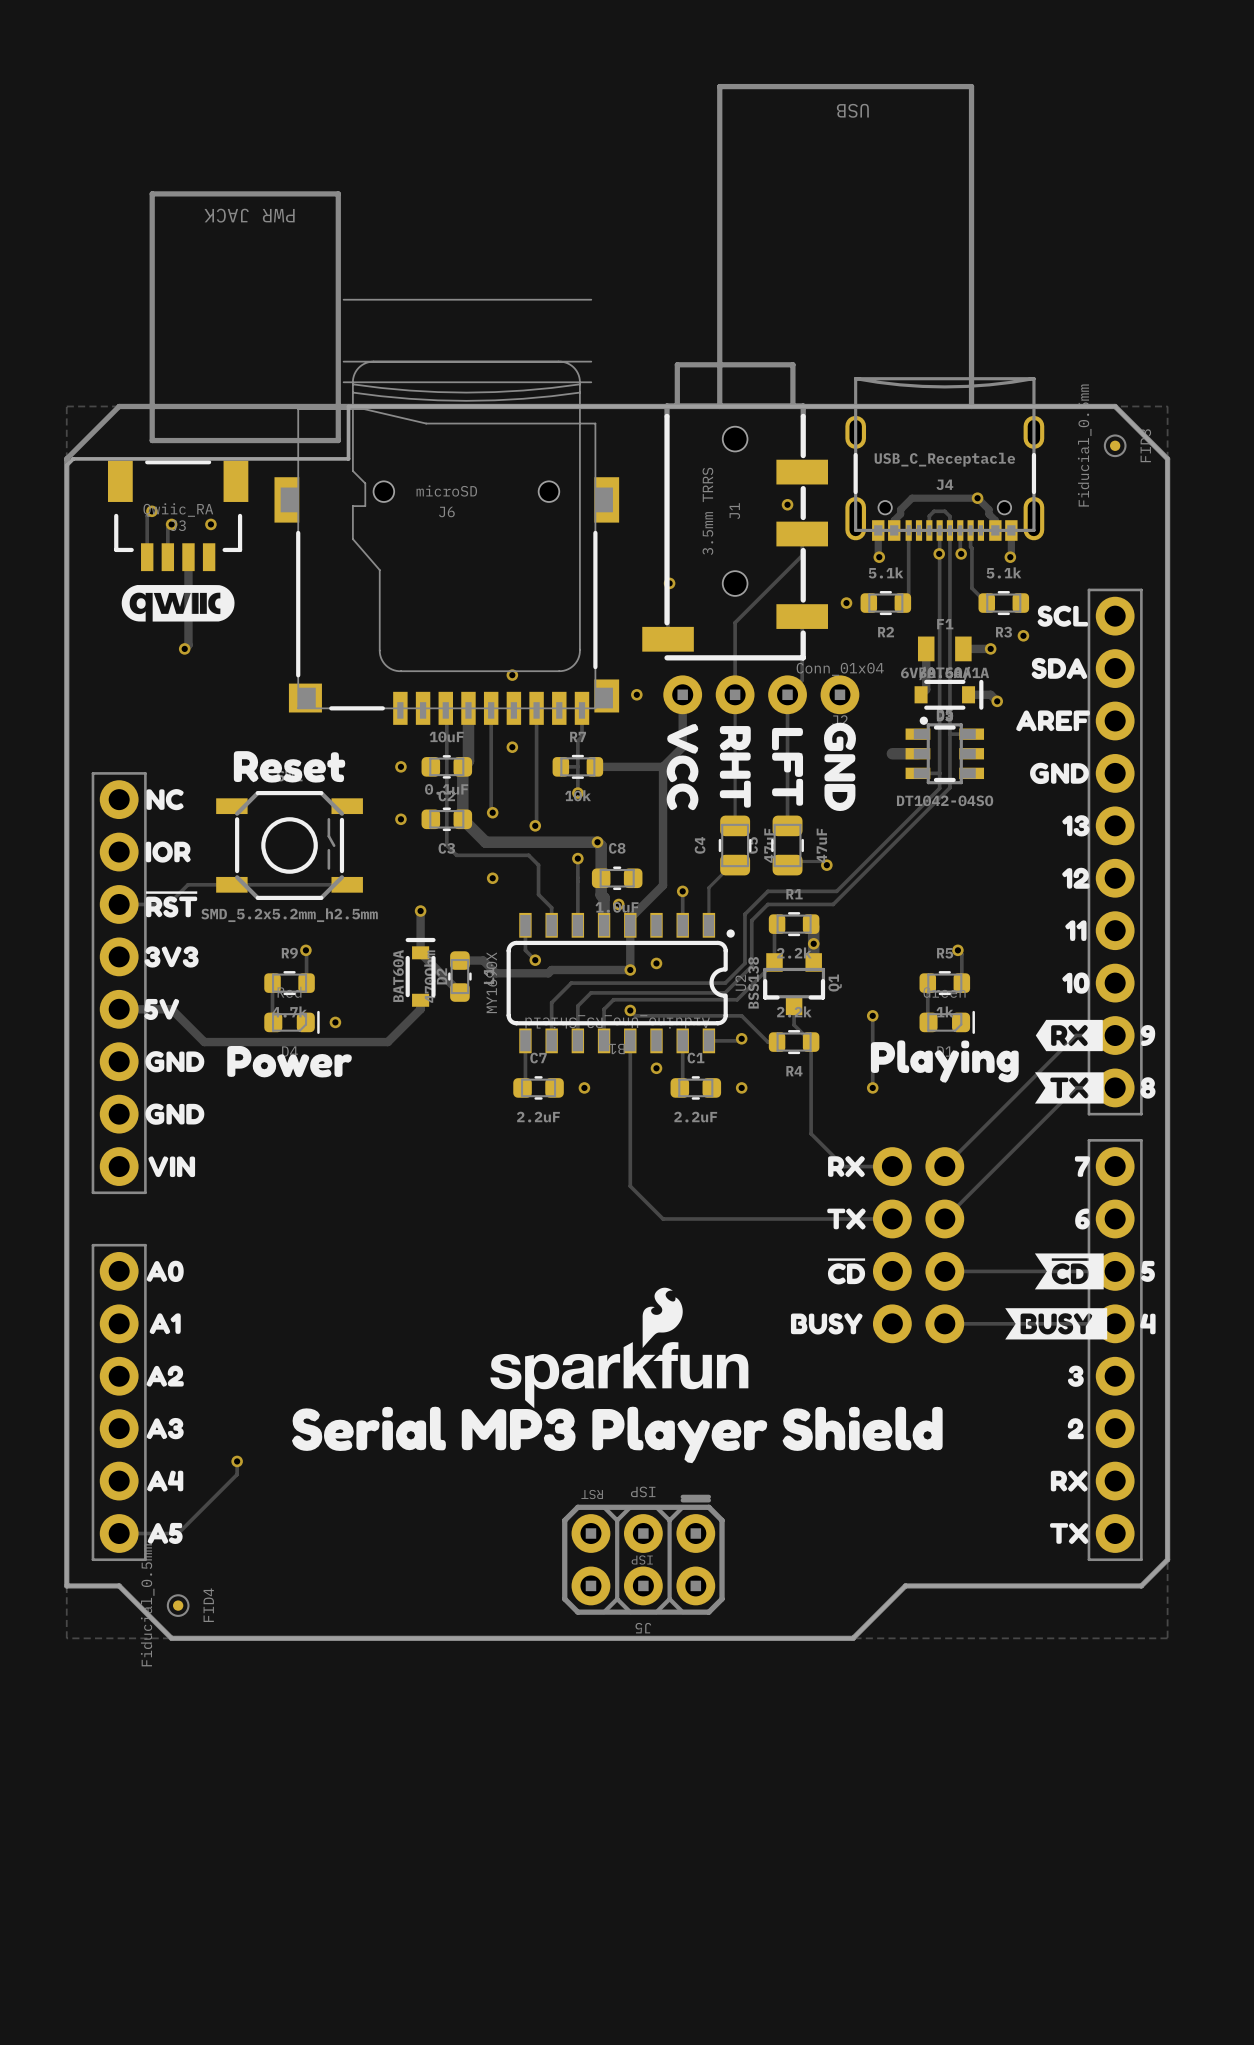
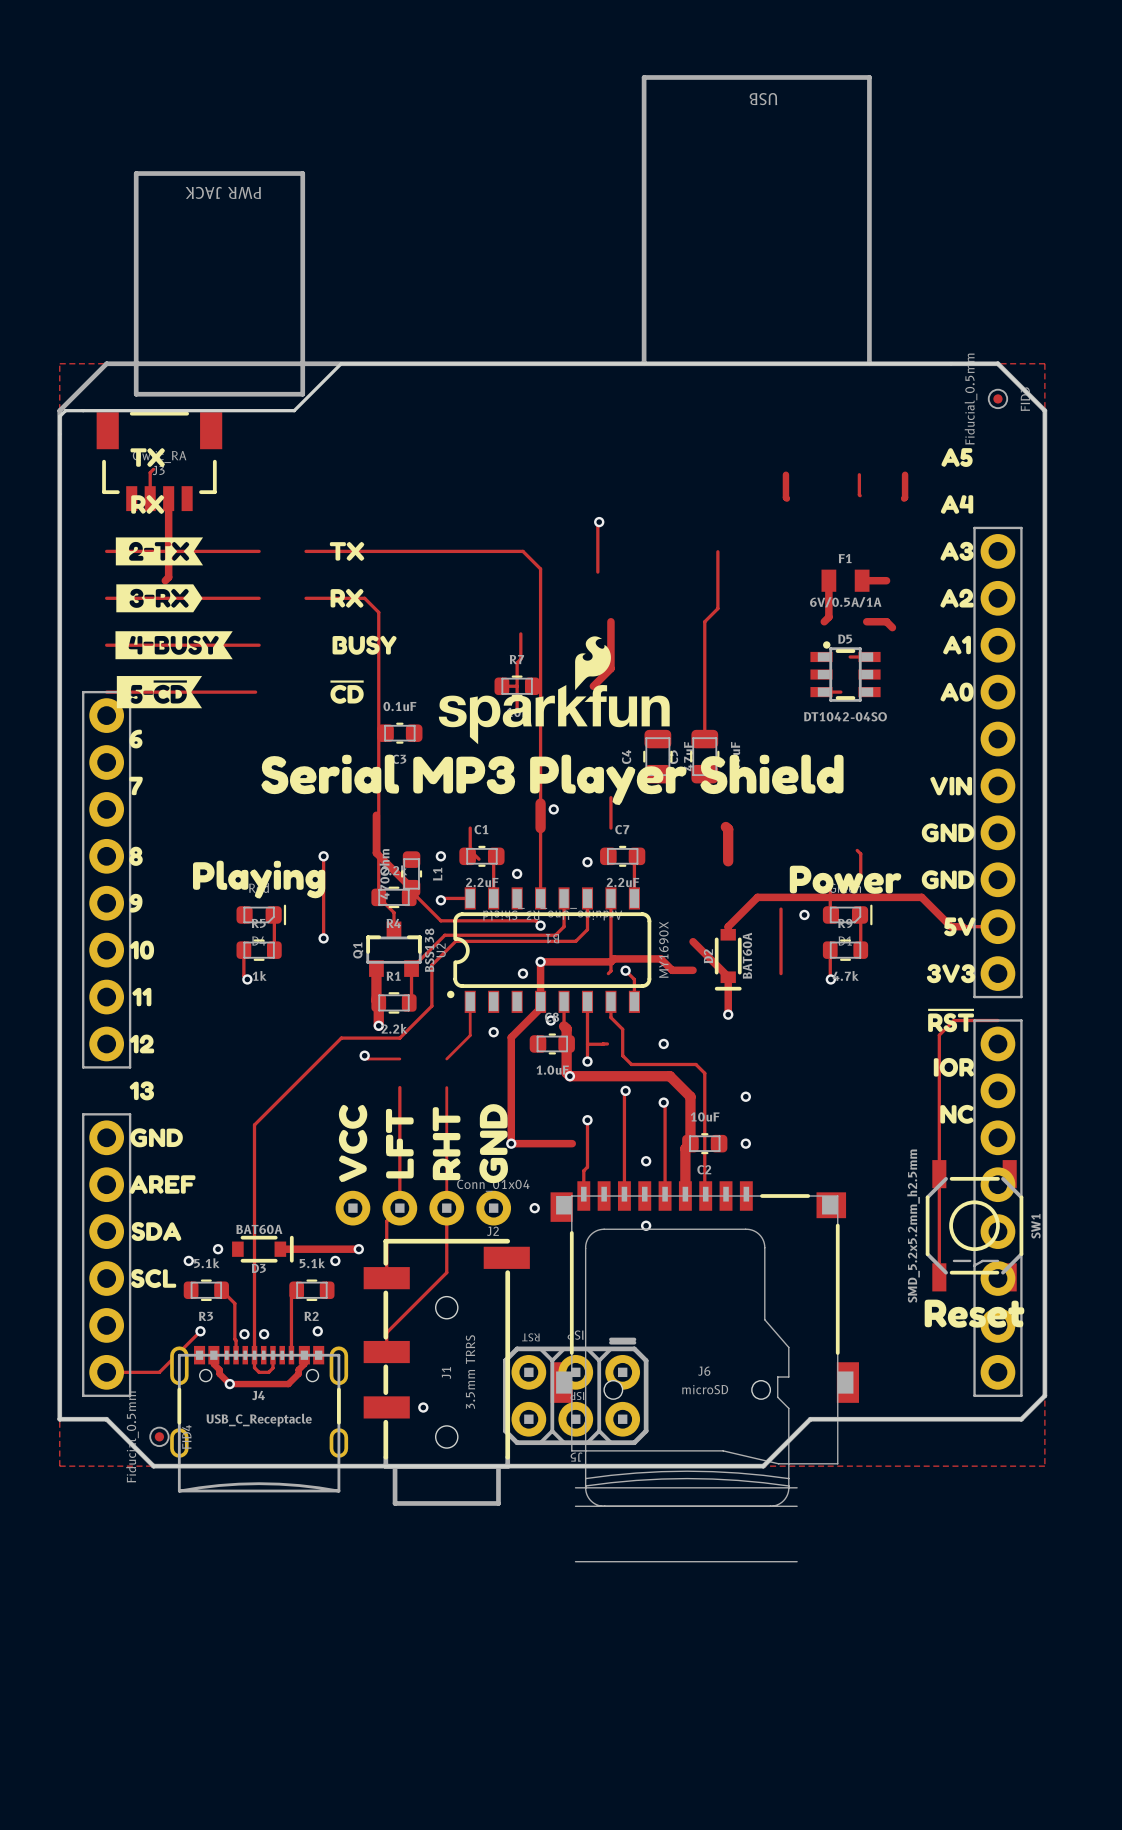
board edge: (381, 406) (348, 406) (348, 458) (328, 458) -> (341, 363) (294, 410)
J4 rotation: 0° (944, 458) -> 180° (259, 1419)
J4 position: (944, 458) -> (259, 1419)
via: (977, 498) -> none
drawing: none -> [130, 448, 165, 468]
drawing: none -> [941, 448, 973, 467]
via: (787, 504) -> none
track: (151, 511) (147, 516) (147, 557) -> none
via: (151, 511) -> none
J1 rotation: 0° (735, 511) -> 180° (446, 1372)
J1 position: (735, 511) -> (446, 1372)
J6 rotation: 0° (446, 512) -> 180° (704, 1371)
J6 position: (446, 512) -> (704, 1371)
via: (171, 524) -> none
via: (210, 524) -> none
track: (894, 530) (894, 520) (900, 514) (900, 509) (912, 498) (977, 498) (988, 509) (988, 514) (995, 520) (995, 530) -> none
track: (908, 530) (908, 597) (902, 603) -> none
track: (929, 530) (929, 516) (934, 511) (944, 511) (949, 516) (949, 787) (833, 904) (767, 904) (751, 920) (751, 966) (725, 992) (590, 992) (577, 1006) (577, 1040) -> none
track: (939, 530) (939, 788) (836, 891) (767, 891) (744, 914) (744, 963) (725, 983) (571, 983) (551, 1002) -> (496, 856) (493, 858) (493, 897)
track: (970, 530) (971, 588) (986, 603) -> none
track: (802, 534) (802, 555) (735, 622) (735, 829) -> none
drawing: none -> [131, 494, 165, 515]
via: (939, 553) -> none
via: (961, 553) -> none
drawing: none -> [940, 495, 974, 514]
via: (879, 557) -> none
via: (1010, 557) -> none
drawing shape: [121, 585, 235, 622] -> [115, 537, 204, 566]
via: (846, 603) -> none
R2 position: (885, 603) -> (311, 1290)
R3 position: (1003, 603) -> (206, 1290)
drawing: none -> [329, 541, 365, 561]
drawing shape: [1037, 605, 1089, 627] -> [940, 541, 974, 561]
track: none -> (106, 551) (259, 551)
via: (1023, 635) -> none
via: (184, 648) -> none
via: (990, 648) -> none
drawing: none -> [115, 584, 233, 749]
drawing: none -> [330, 588, 364, 608]
drawing shape: [1031, 657, 1088, 680] -> [940, 588, 974, 608]
track: none -> (106, 598) (259, 598)
track: none -> (306, 598) (364, 598) (378, 612) (378, 897) (393, 912) (393, 929)
via: (512, 675) -> none
via: (636, 694) -> none
J2 position: (761, 694) -> (423, 1208)
D3 position: (949, 694) -> (262, 1249)
via: (997, 701) -> none
track: (445, 708) (446, 845) (456, 855) (528, 855) (538, 865) (538, 894) (551, 907) (551, 925) -> none
track: (468, 708) (468, 761) (462, 766) (462, 819) (485, 842) (597, 842) (601, 845) (601, 895) (604, 897) -> (306, 551) (522, 551) (540, 568) (540, 803)
track: (491, 708) (492, 812) -> none
track: (536, 708) (535, 825) -> none
drawing: none -> [332, 635, 397, 655]
drawing shape: [1016, 710, 1090, 732] -> [943, 635, 971, 655]
drawing: none -> [261, 636, 844, 806]
track: none -> (106, 645) (259, 645)
drawing: [666, 722, 856, 812] -> none
via: (512, 747) -> none
drawing: [233, 751, 346, 783] -> none
track: (892, 753) (917, 753) -> none
drawing: none -> [330, 680, 364, 704]
drawing shape: [1030, 762, 1089, 785] -> [940, 682, 974, 702]
via: (400, 766) -> none
C2 position: (446, 766) -> (704, 1143)
track: (594, 766) (663, 766) (663, 885) (630, 918) (630, 969) (551, 969) (548, 973) (495, 973) (483, 960) (459, 960) -> none
track: none -> (106, 692) (255, 692)
drawing: [146, 789, 184, 811] -> none
via: (577, 793) -> none
via: (492, 812) -> none
drawing: [1062, 815, 1090, 837] -> none
via: (400, 819) -> none
via: (535, 825) -> none
drawing: [145, 841, 191, 863] -> none
via: (597, 842) -> none
SW1 rotation: 0° (289, 845) -> 90° clockwise (974, 1225)
SW1 position: (289, 845) -> (974, 1225)
track: (577, 858) (577, 925) -> (587, 1001) (587, 1061)
via: (577, 858) -> none
track: (735, 861) (708, 887) (708, 925) -> none
track: (787, 861) (823, 861) (826, 865) -> none
via: (826, 865) -> none
drawing: none -> [129, 776, 143, 796]
drawing shape: [1062, 867, 1090, 889] -> [930, 776, 973, 796]
via: (492, 878) -> none
C8 position: (617, 878) -> (552, 1043)
track: (347, 884) (187, 884) (168, 904) (119, 904) -> none
drawing: [145, 891, 198, 918] -> none
via: (682, 891) -> none
via: (420, 911) -> none
drawing shape: [1065, 920, 1087, 942] -> [921, 823, 975, 843]
track: (777, 924) (774, 926) (774, 962) (737, 999) (613, 999) (604, 1009) (604, 1040) -> none
R1 position: (794, 924) -> (393, 1002)
via: (813, 943) -> none
drawing shape: [144, 946, 199, 968] -> [129, 846, 143, 866]
track: (305, 950) (306, 983) -> none
via: (305, 950) -> none
via: (957, 950) -> none
track: none -> (323, 856) (323, 938)
via: none -> (323, 856)
via: none -> (440, 856)
track: none -> (636, 856) (634, 858) (634, 898)
via: (535, 960) -> none
drawing: none -> [192, 860, 326, 899]
drawing: none -> [789, 865, 902, 894]
via: (630, 969) -> none
D2 rotation: 0° (420, 972) -> 180° (728, 959)
D2 position: (420, 972) -> (728, 959)
drawing shape: [1062, 972, 1090, 994] -> [921, 870, 975, 890]
via: none -> (517, 873)
track: (272, 983) (273, 1022) -> none
R9 position: (289, 983) -> (845, 950)
U2 rotation: 0° (620, 983) -> 180° (549, 950)
R5 position: (944, 983) -> (259, 950)
Q1 rotation: 0° (794, 984) -> 180° (393, 949)
Q1 position: (794, 984) -> (393, 949)
drawing shape: [144, 998, 180, 1021] -> [129, 893, 143, 913]
track: (420, 1000) (420, 1009) (387, 1042) (204, 1042) (171, 1009) (119, 1009) -> none
track: none -> (409, 897) (417, 897) (440, 920) (535, 920) (540, 925)
track: none -> (470, 898) (442, 898) (440, 900)
track: (551, 1003) (551, 1040) -> (610, 898) (610, 931)
track: none -> (564, 898) (564, 926) (555, 935) (444, 935) (411, 968) (411, 1000) (409, 1002)
track: none -> (587, 898) (587, 929) (575, 941) (455, 941) (431, 965) (431, 1006) (399, 1038) (341, 1038) (254, 1124) (254, 1367) (259, 1372) (268, 1372) (272, 1368) (272, 1355)
track: (794, 1005) (794, 1025) (811, 1042) (811, 1133) (843, 1166) (892, 1166) -> none
via: none -> (440, 900)
track: (630, 1010) (635, 1015) (741, 1015) (767, 1042) (777, 1042) -> none
via: (630, 1010) -> none
via position: (872, 1015) -> (804, 914)
drawing shape: [1035, 1019, 1103, 1052] -> [944, 917, 976, 937]
track: none -> (273, 914) (274, 950)
via: (335, 1022) -> none
track: none -> (860, 914) (860, 950)
drawing: [1140, 1025, 1156, 1047] -> none
via: none -> (540, 925)
track: (1075, 1035) (944, 1166) -> (962, 926) (951, 926) (921, 897) (757, 897) (728, 926) (728, 934)
track: (741, 1038) (739, 1040) (708, 1040) -> none
via: (741, 1038) -> none
track: (525, 1040) (525, 1085) (522, 1087) -> none
track: (630, 1040) (630, 1119) -> (540, 828) (540, 898)
drawing: [870, 1040, 1019, 1083] -> none
R4 position: (794, 1042) -> (393, 897)
drawing: [227, 1045, 352, 1078] -> none
via: none -> (323, 938)
drawing shape: [145, 1051, 205, 1073] -> [129, 940, 155, 960]
track: none -> (693, 941) (728, 976) (728, 1014)
track: none -> (243, 950) (243, 975) (247, 979)
track: none -> (830, 950) (830, 979)
via: (656, 1068) -> none
drawing shape: [1034, 1072, 1104, 1104] -> [926, 964, 976, 984]
via: none -> (540, 961)
drawing: [1140, 1077, 1156, 1099] -> none
track: none -> (376, 968) (378, 1025)
track: none -> (625, 970) (634, 979) (634, 1001)
via: none -> (625, 970)
track: none -> (693, 970) (672, 970) (660, 958) (613, 958) (610, 961) (540, 961) (540, 1008) (511, 1037) (511, 1143) (572, 1143)
C7 position: (538, 1087) -> (622, 856)
C1 position: (695, 1087) -> (481, 856)
via: (741, 1087) -> none
via: (872, 1087) -> none
track: (1115, 1087) (1075, 1087) (944, 1218) -> none
via: none -> (247, 979)
via: none -> (830, 979)
drawing shape: [145, 1103, 205, 1125] -> [132, 987, 152, 1007]
track: none -> (470, 1001) (470, 1035) (446, 1058)
track: none -> (610, 1001) (610, 1017) (622, 1029) (622, 1055) (631, 1064) (695, 1064) (704, 1073) (705, 1196)
drawing: none -> [928, 1008, 974, 1033]
via: none -> (728, 1014)
via: none -> (550, 1020)
track: none -> (997, 1020) (953, 1020) (939, 1035) (939, 1277)
via: none -> (378, 1025)
track: (630, 1146) (630, 1186) (663, 1218) (892, 1218) -> (564, 1026) (566, 1028) (566, 1072) (569, 1076) (669, 1076) (690, 1096) (690, 1143) (685, 1148) (685, 1196)
via: none -> (493, 1032)
drawing: [828, 1155, 865, 1178] -> none
drawing shape: [148, 1156, 196, 1178] -> [129, 1034, 155, 1054]
drawing: [1074, 1156, 1090, 1177] -> none
track: none -> (607, 1043) (587, 1044)
via: none -> (663, 1043)
part: (918, 1166) -> none
track: none -> (364, 1055) (367, 1058) (399, 1058)
via: none -> (364, 1055)
drawing: none -> [933, 1057, 975, 1077]
via: none -> (587, 1061)
via: none -> (569, 1076)
drawing: none -> [129, 1081, 155, 1101]
drawing: [827, 1208, 866, 1230] -> none
drawing: [1005, 1208, 1108, 1340] -> none
track: none -> (399, 1087) (399, 1208) (386, 1221) (386, 1278)
track: none -> (446, 1087) (446, 1272) (386, 1332) (386, 1352)
track: none -> (625, 1090) (624, 1196)
via: none -> (625, 1090)
part: (918, 1218) -> none
via: none -> (745, 1096)
track: none -> (663, 1102) (665, 1196)
via: none -> (663, 1102)
drawing: none -> [338, 1104, 508, 1184]
drawing: none -> [940, 1104, 974, 1124]
track: none -> (587, 1120) (587, 1167) (583, 1170) (583, 1196)
via: none -> (587, 1120)
drawing: [827, 1258, 866, 1285] -> none
drawing shape: [146, 1260, 184, 1283] -> [130, 1128, 183, 1148]
drawing: [1140, 1260, 1155, 1282] -> none
part: (918, 1271) -> none
track: (948, 1271) (1115, 1271) -> none
via: none -> (511, 1143)
via: none -> (745, 1143)
drawing: [291, 1287, 943, 1464] -> none
via: none -> (646, 1161)
drawing shape: [149, 1313, 181, 1335] -> [129, 1175, 196, 1194]
drawing: [790, 1313, 863, 1335] -> none
drawing: [1140, 1313, 1156, 1335] -> none
part: (918, 1323) -> none
track: (944, 1323) (1115, 1323) -> none
via: none -> (534, 1208)
drawing shape: [146, 1365, 184, 1387] -> [131, 1222, 182, 1242]
drawing: [1067, 1365, 1084, 1387] -> none
via: none -> (646, 1225)
via: none -> (218, 1249)
track: none -> (280, 1249) (358, 1249)
via: none -> (358, 1249)
via: none -> (188, 1260)
via: none -> (335, 1260)
drawing shape: [146, 1417, 184, 1440] -> [131, 1268, 177, 1289]
drawing: [1067, 1418, 1084, 1440] -> none
track: none -> (221, 1290) (234, 1303) (236, 1355)
track: none -> (296, 1290) (291, 1295) (291, 1355)
drawing: none -> [924, 1299, 1025, 1328]
track: (237, 1461) (237, 1474) (224, 1487) -> none
via: (237, 1461) -> none
drawing: [147, 1470, 184, 1492] -> none
drawing: [1050, 1470, 1088, 1492] -> none
via: none -> (200, 1331)
via: none -> (317, 1331)
via: none -> (244, 1334)
via: none -> (264, 1334)
track: none -> (213, 1355) (213, 1364) (219, 1369) (219, 1373) (229, 1384) (288, 1384) (298, 1373) (298, 1369) (304, 1364) (304, 1355)
drawing: [147, 1522, 183, 1545] -> none
drawing: [1050, 1522, 1089, 1545] -> none
via: none -> (229, 1384)
via: none -> (423, 1407)

